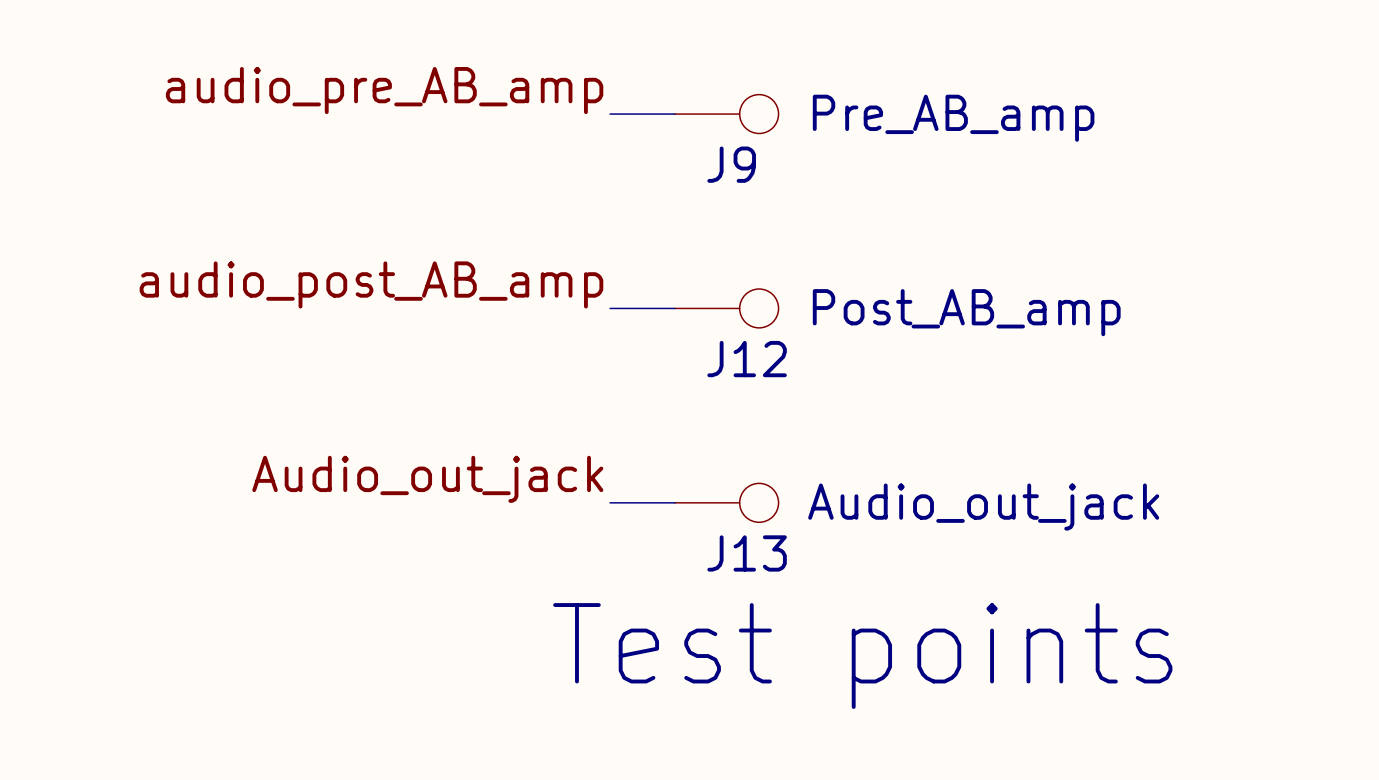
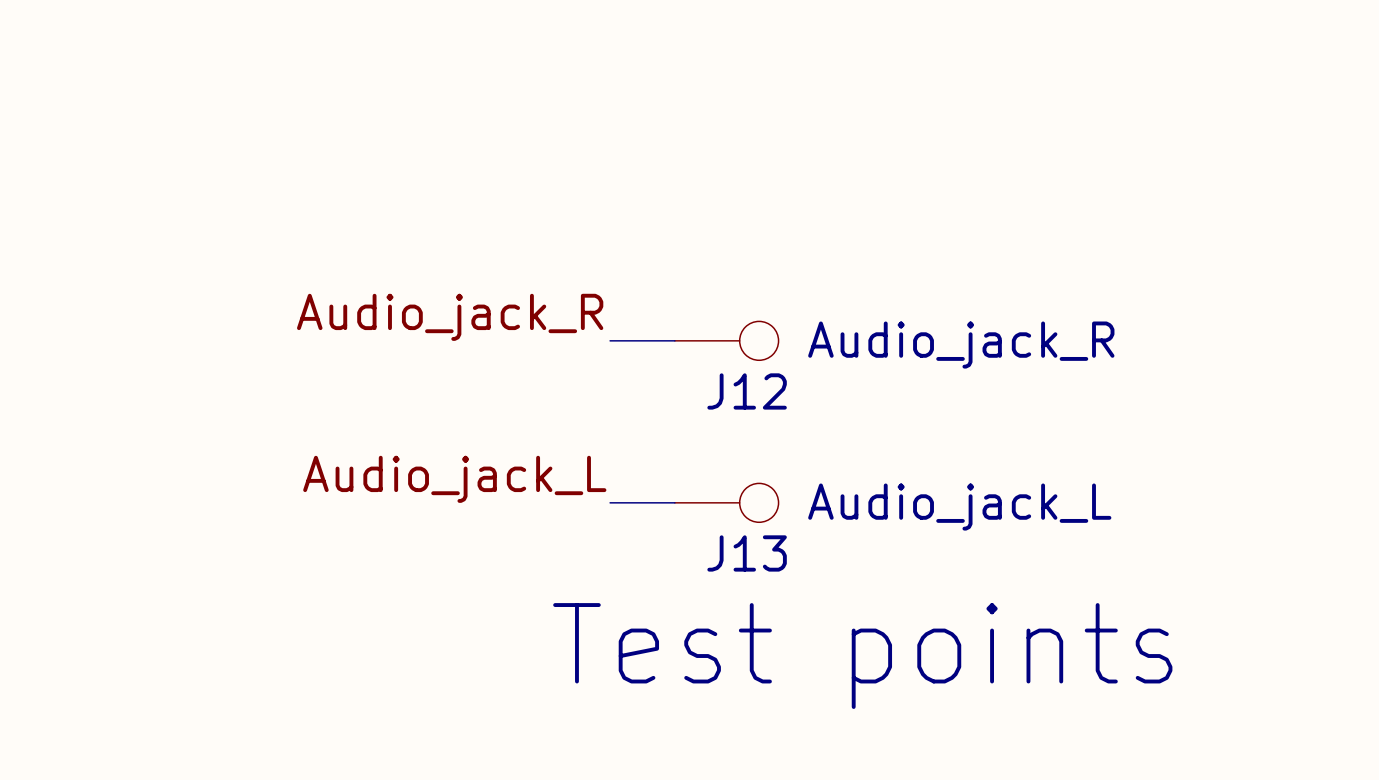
label: audio_pre_AB_amp (384, 90) -> none
wire: (610, 114) (674, 114) -> none
J9: Pre_AB_amp (726, 114) -> none
label: audio_post_AB_amp (371, 284) -> none
wire: (610, 308) (674, 308) -> (610, 340) (674, 340)
J12 position: (726, 308) -> (726, 340)
J12 value: Post_AB_amp (966, 312) -> Audio_jack_R (961, 345)
label: none -> Audio_jack_R (450, 317)
label: Audio_out_jack (427, 479) -> Audio_jack_L (454, 479)
J13 value: Audio_out_jack (983, 507) -> Audio_jack_L (959, 507)

